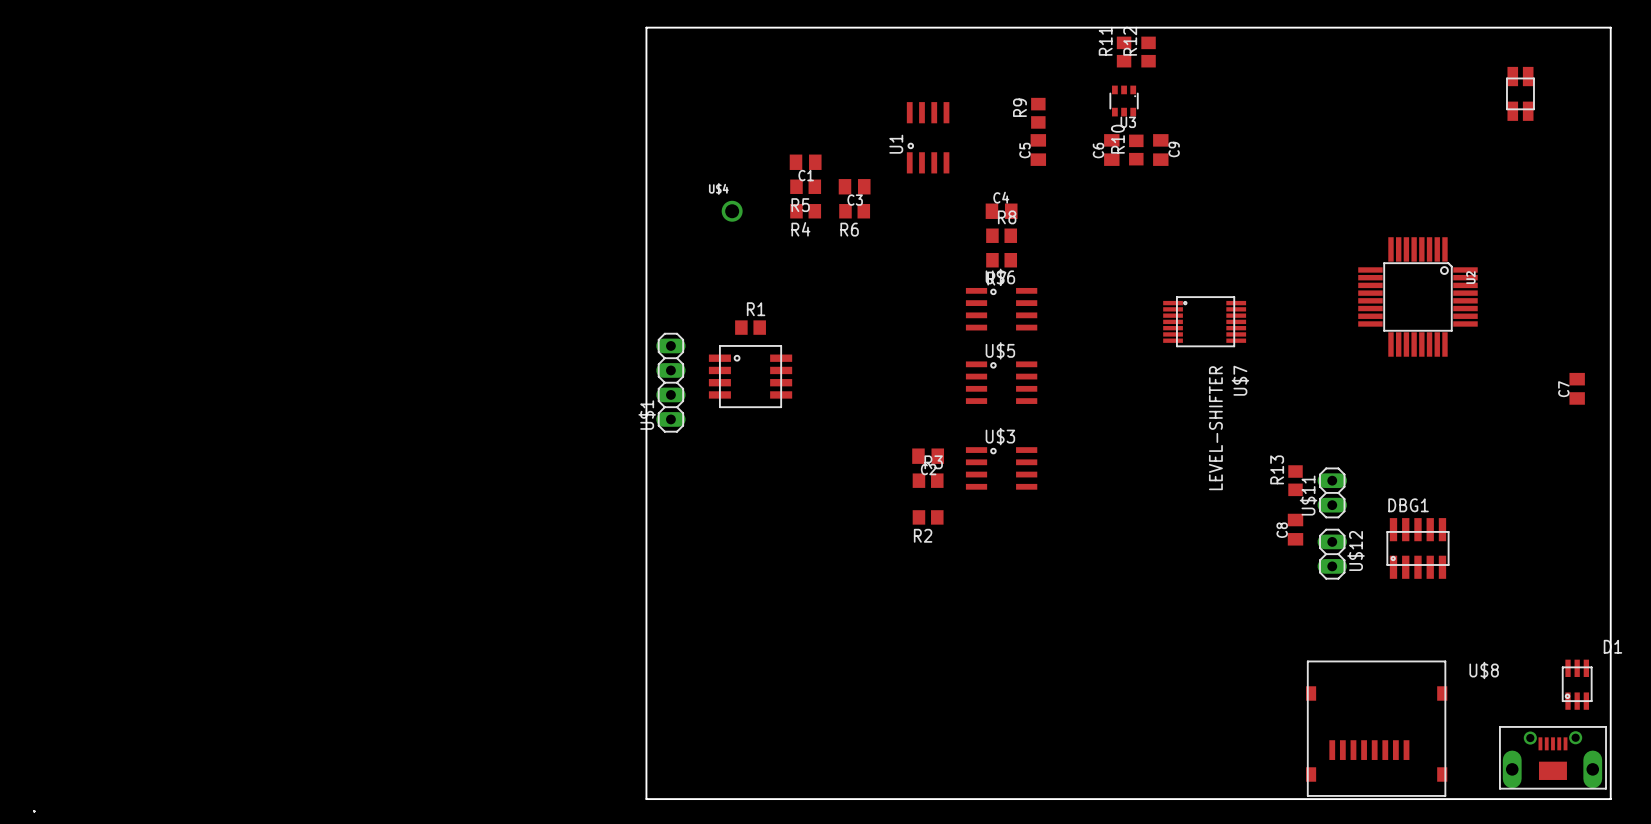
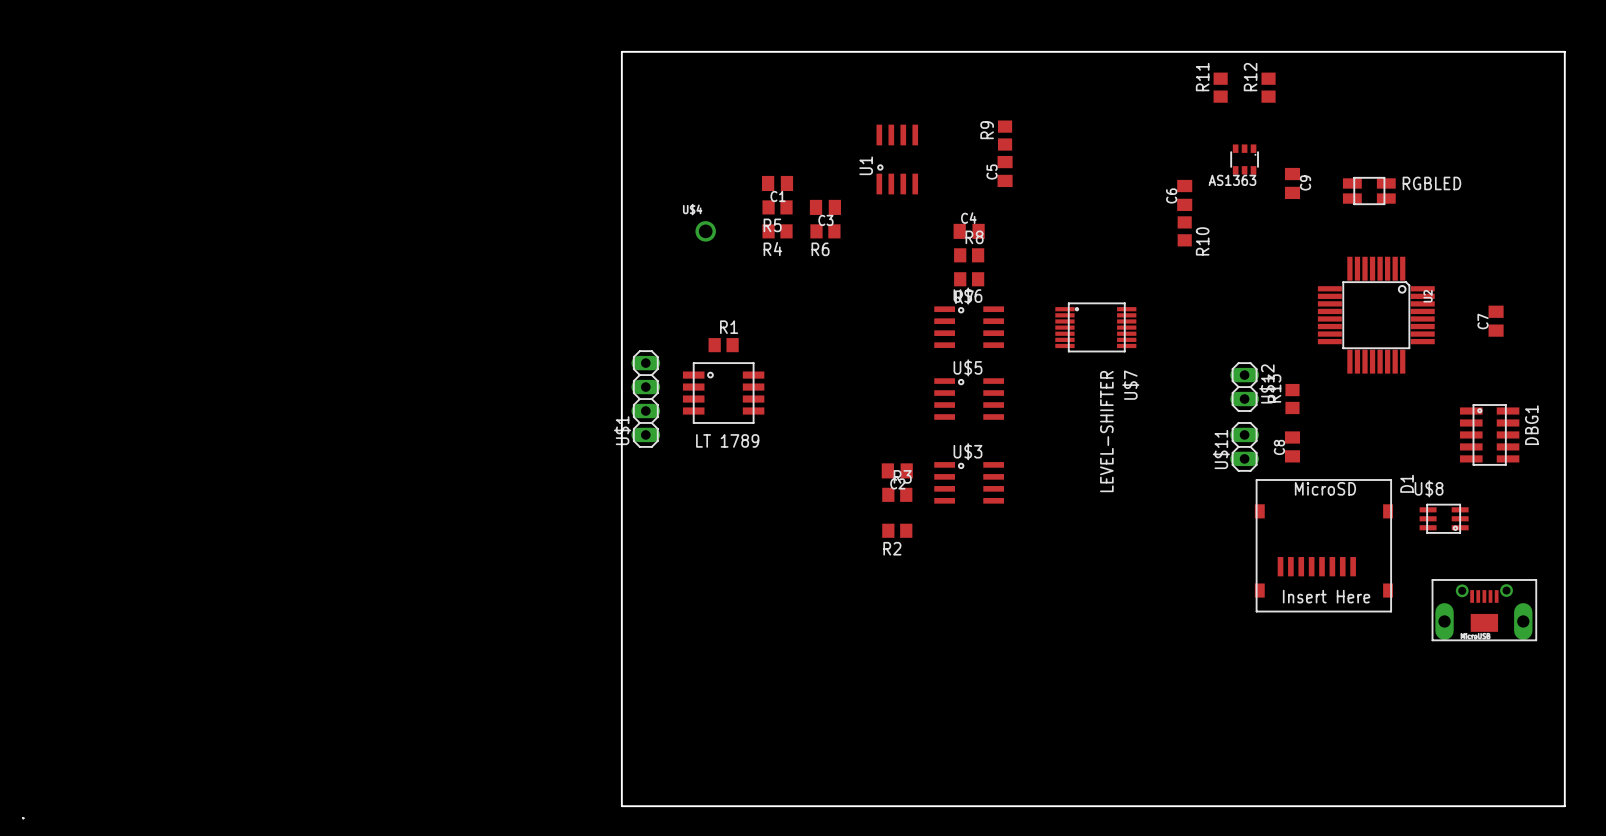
R11 position: (1124, 52) -> (1220, 87)
R12 position: (1148, 52) -> (1268, 87)
part: (1520, 93) -> none
U3: (1124, 101) -> none
AS1363: none -> (1244, 159)
R10 name position: R10 (1117, 139) -> R10 (1202, 241)
C6 position: (1111, 150) -> (1184, 195)
R10 position: (1136, 150) -> (1184, 231)
C9 position: (1160, 150) -> (1292, 183)
part: none -> RGBLED (1369, 191)
U$7 position: (1204, 321) -> (1095, 327)
C7 position: (1577, 388) -> (1496, 321)
text: none -> LT 1789 (727, 440)
U$8 text: none -> MicroSD (1325, 488)
R13 position: (1295, 480) -> (1292, 399)
U$11 position: (1332, 492) -> (1244, 446)
C8 position: (1295, 529) -> (1292, 446)
DBG1 rotation: 0° (1417, 548) -> 90° clockwise (1489, 434)
DBG1 position: (1417, 548) -> (1489, 434)
U$12 position: (1332, 554) -> (1244, 387)
U$8 text: none -> Insert Here (1326, 596)
part: none -> (1484, 610)
D1 rotation: 0° (1577, 684) -> 90° counterclockwise (1444, 518)
D1 position: (1577, 684) -> (1444, 518)
U$8 position: (1376, 728) -> (1323, 545)
part: (1552, 757) -> none

